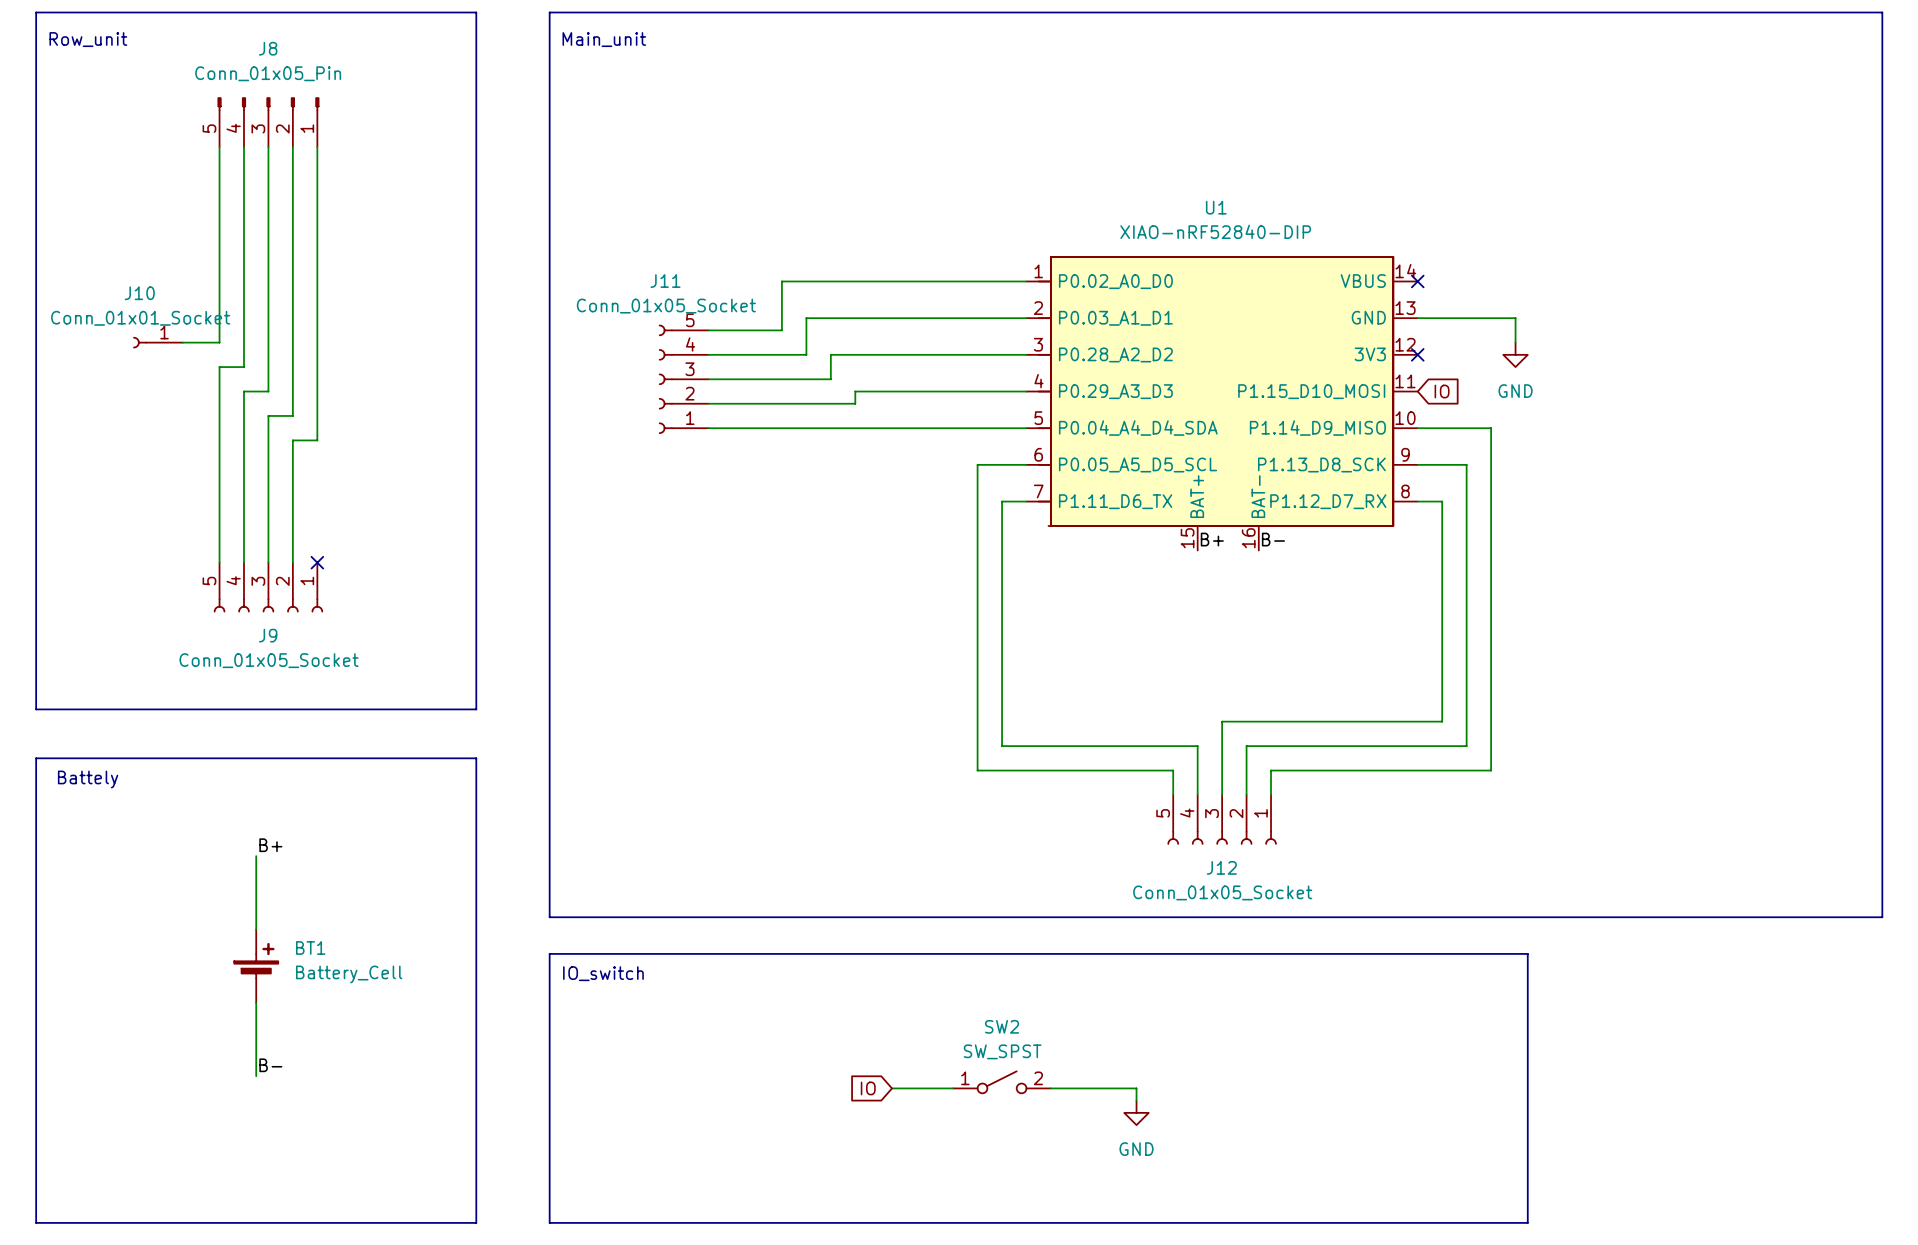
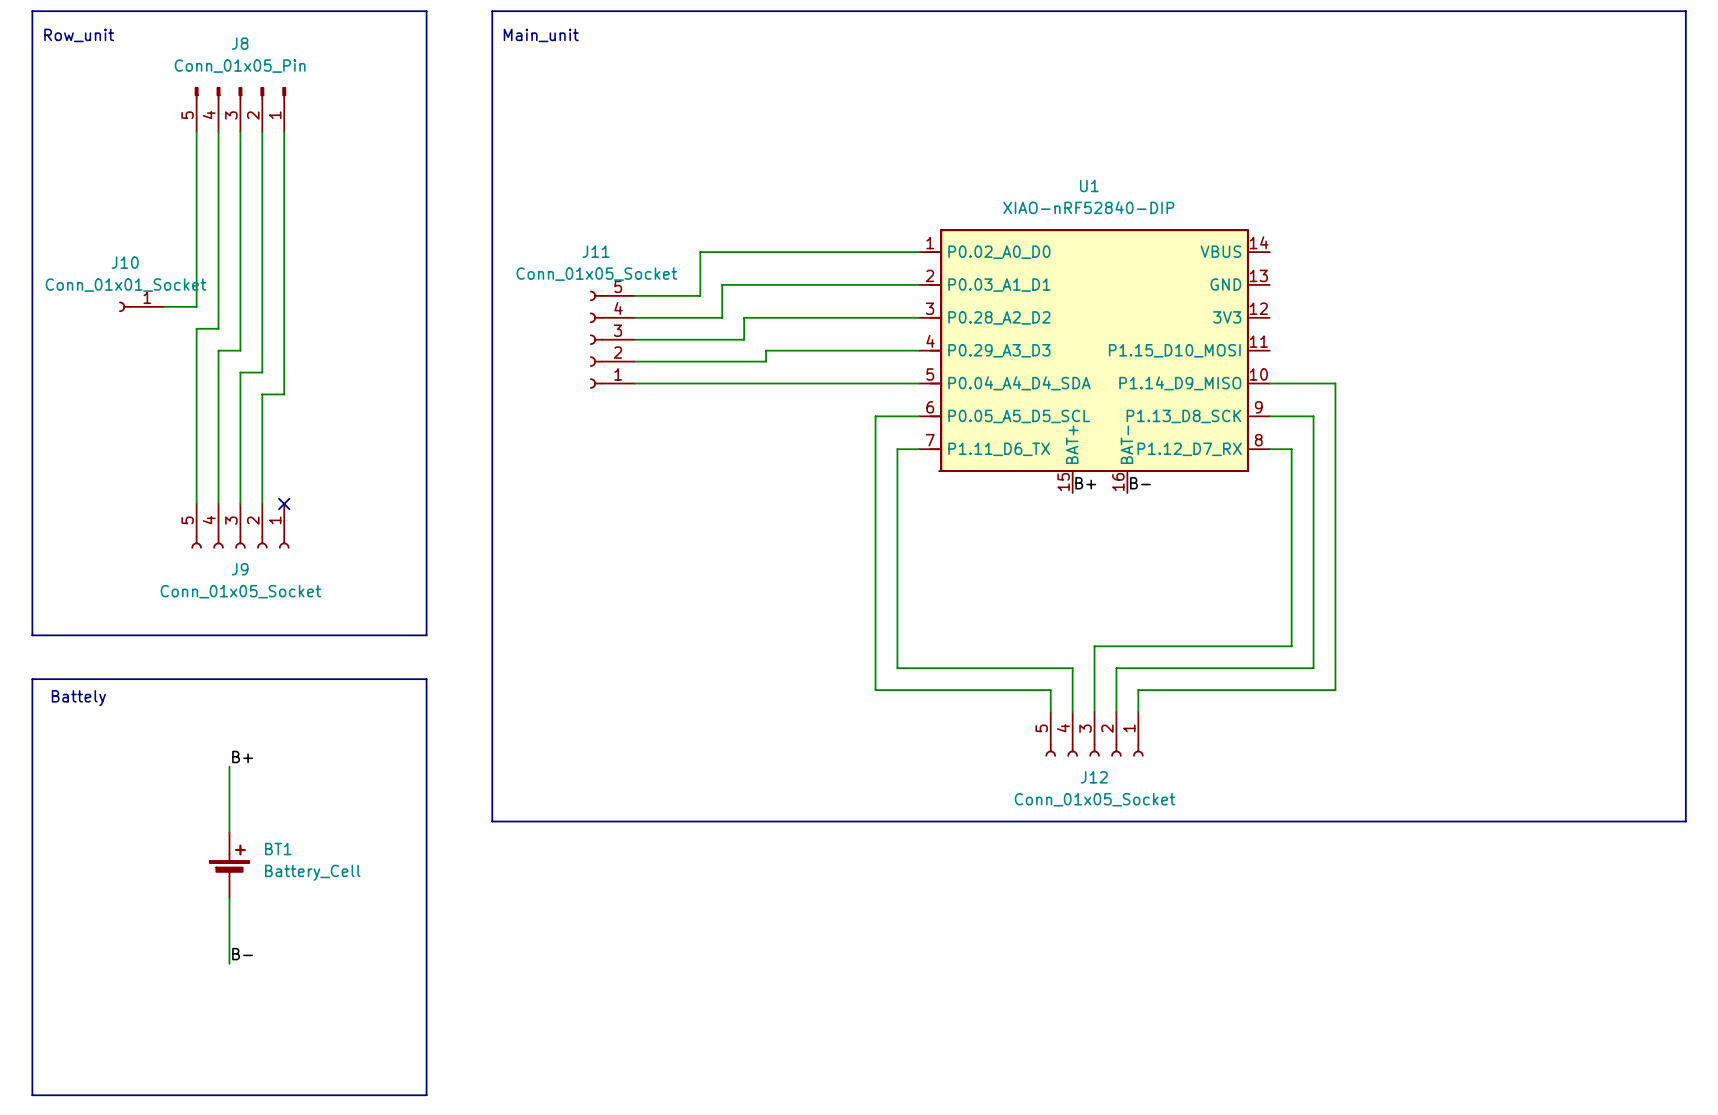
no-connect mark: (1417, 281) -> none
wire: (1417, 318) (1515, 318) (1515, 342) -> none
no-connect mark: (1417, 354) -> none
power symbol: GND (1515, 354) -> none
global label: IO (1442, 391) -> none
line: (549, 953) (1527, 953) (1527, 1222) (549, 1222) (549, 953) -> none
text: IO_switch (603, 973) -> none
SW2: SW_SPST (1002, 1082) -> none
global label: IO (868, 1088) -> none
wire: (891, 1088) (953, 1088) -> none
wire: (1050, 1088) (1136, 1088) (1136, 1100) -> none
power symbol: GND (1136, 1112) -> none

